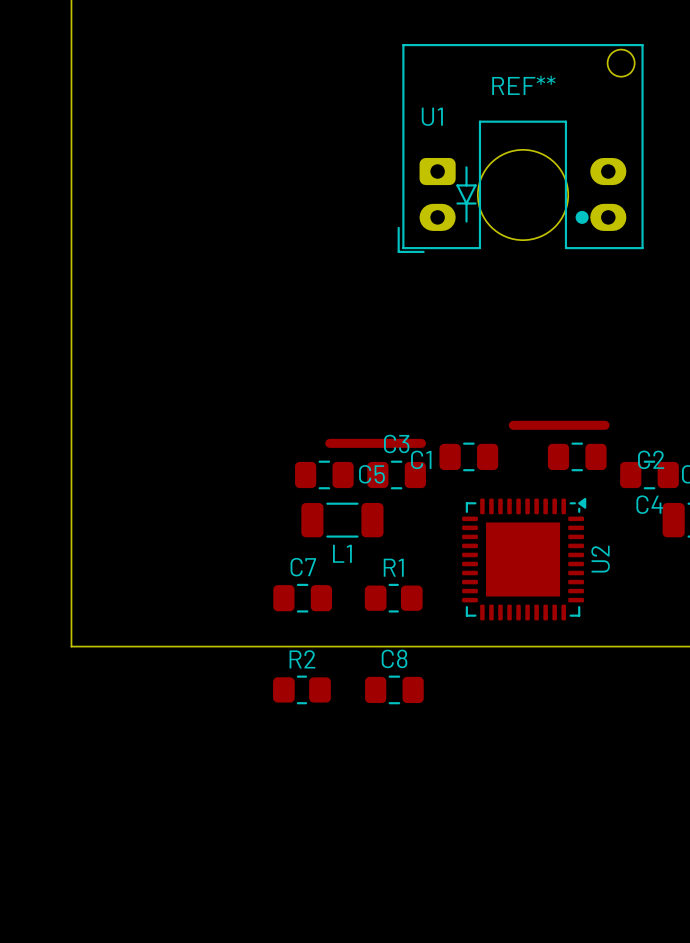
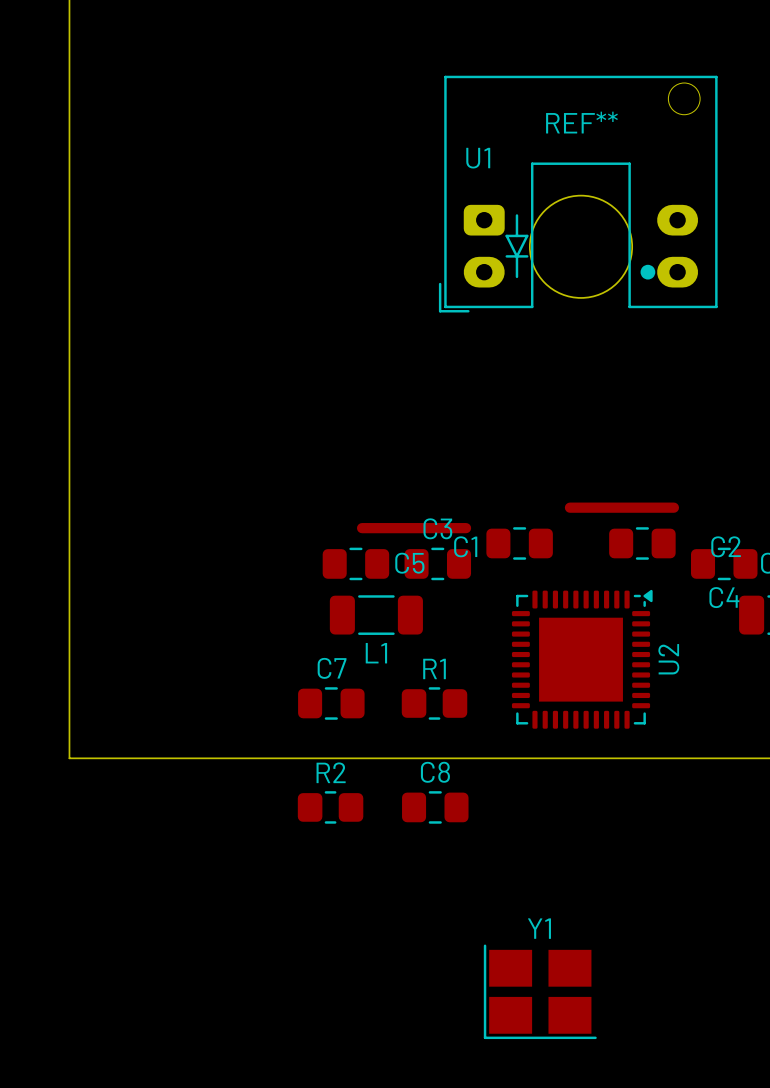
U1 footprint: [397, 43, 644, 253] -> [438, 75, 718, 313]
Y1: none -> (540, 991)

